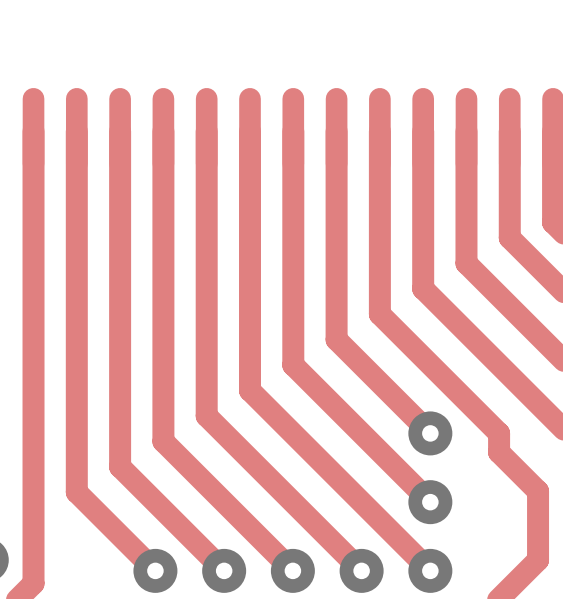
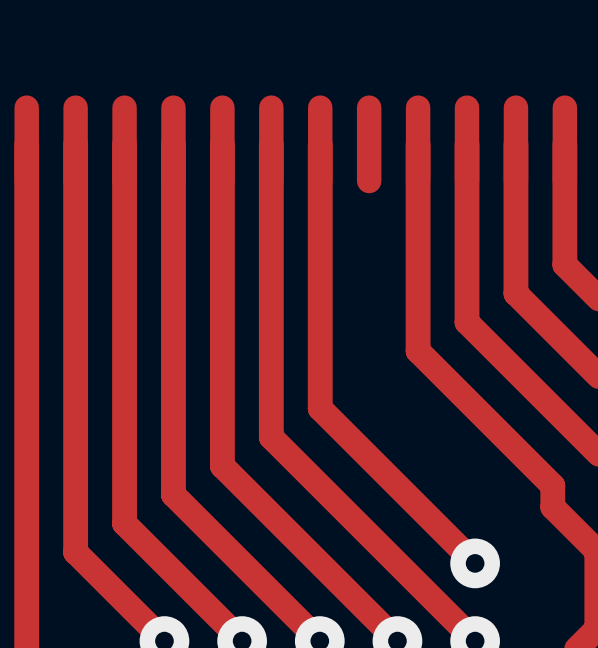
track: (336, 131) (336, 339) (430, 433) -> none
via: (430, 433) -> none

